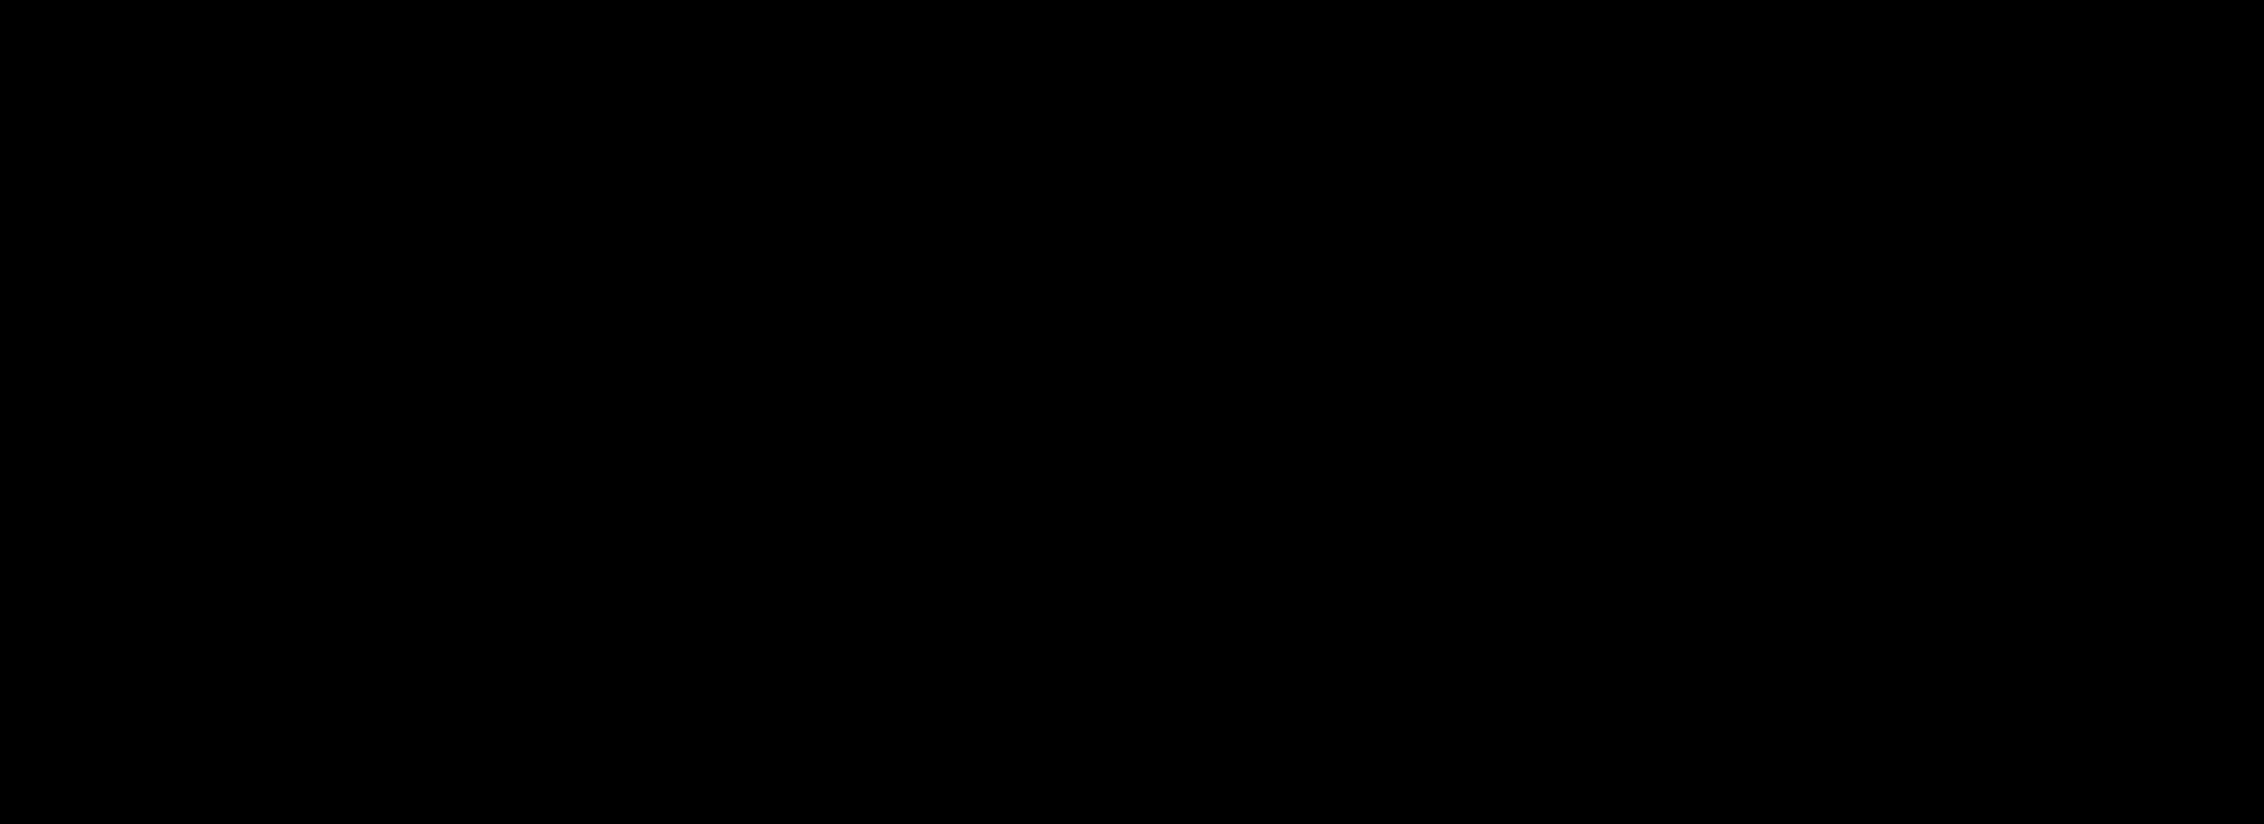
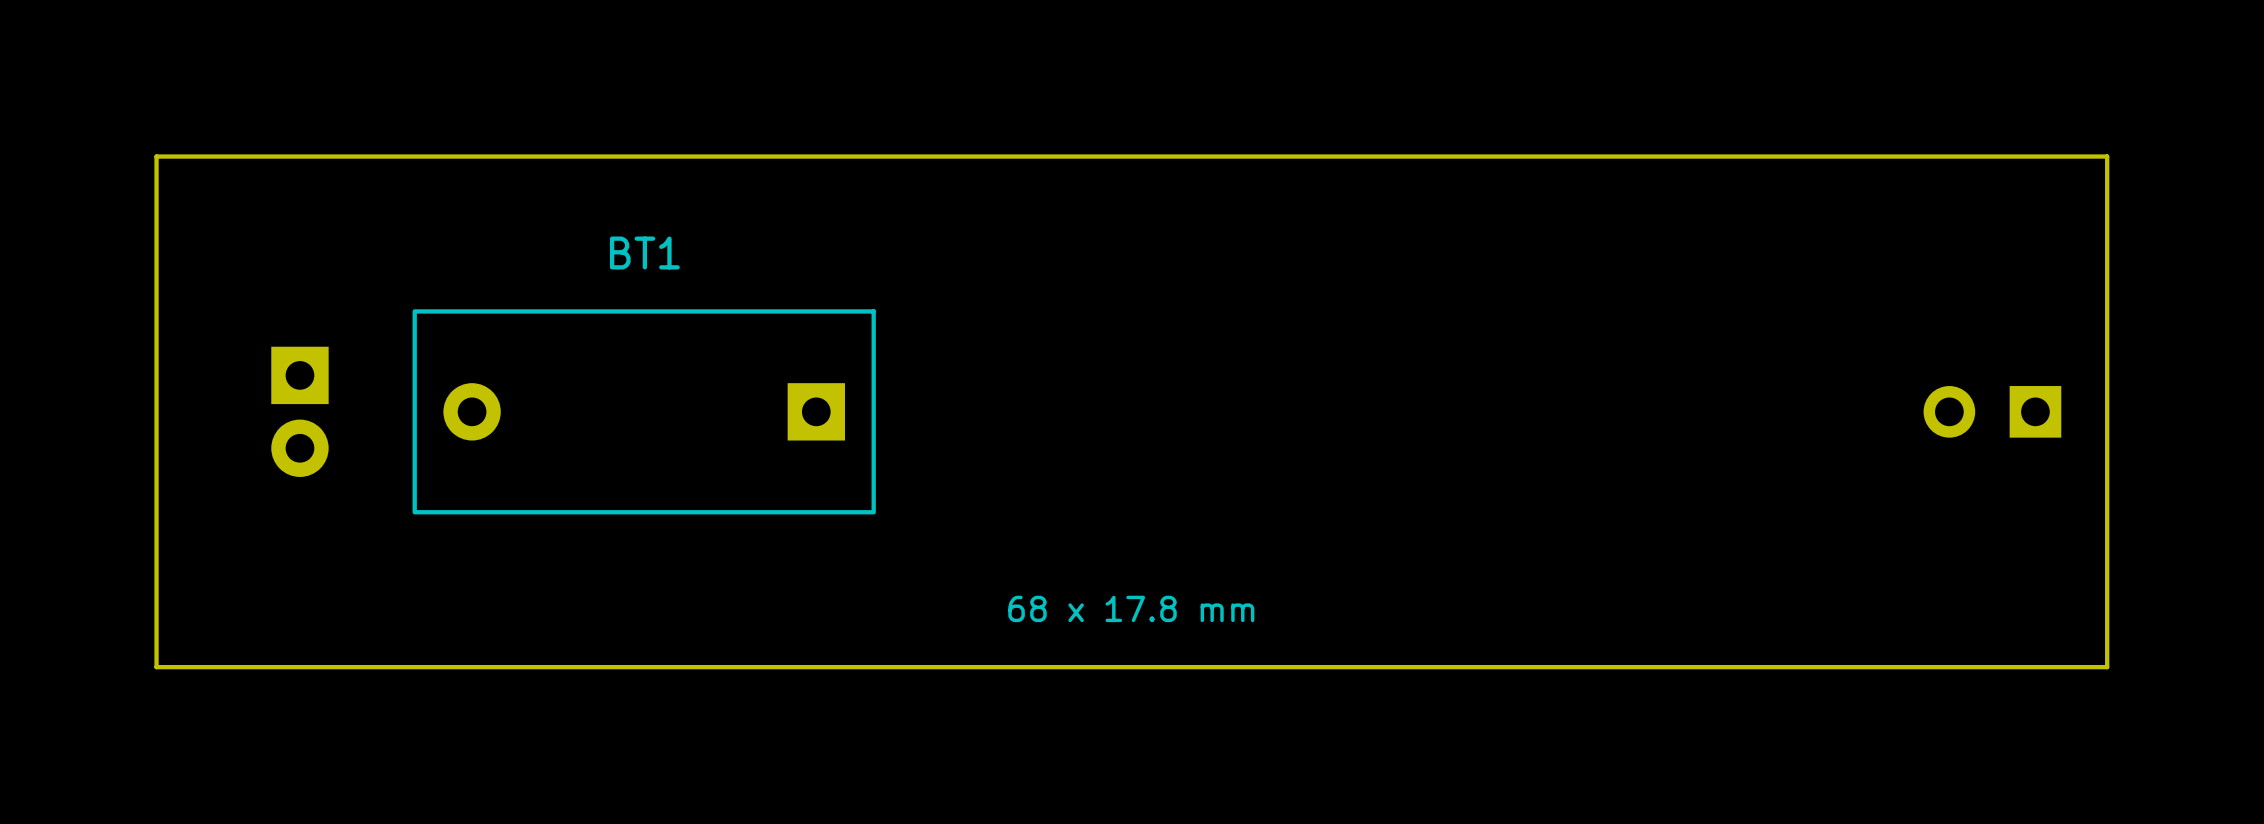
board edge: none -> (2107, 156) (156, 156) (156, 667) (2107, 667) (2107, 156)
part: none -> (299, 411)
BT1: none -> (644, 411)
part: none -> (1992, 411)
text: none -> 68 x 17.8 mm (1131, 608)

